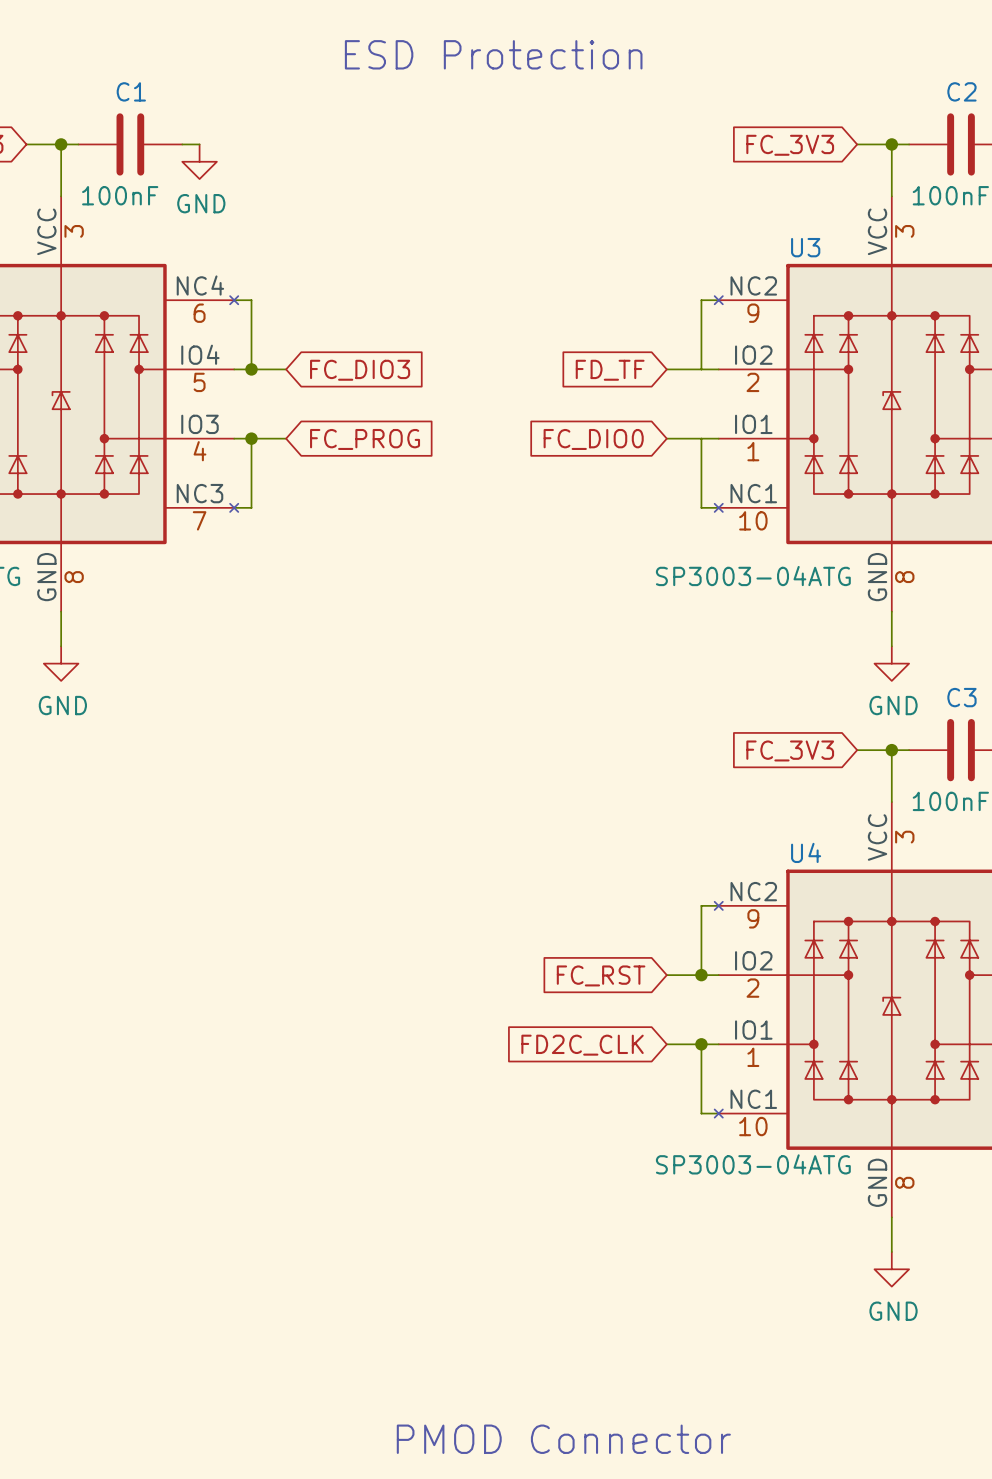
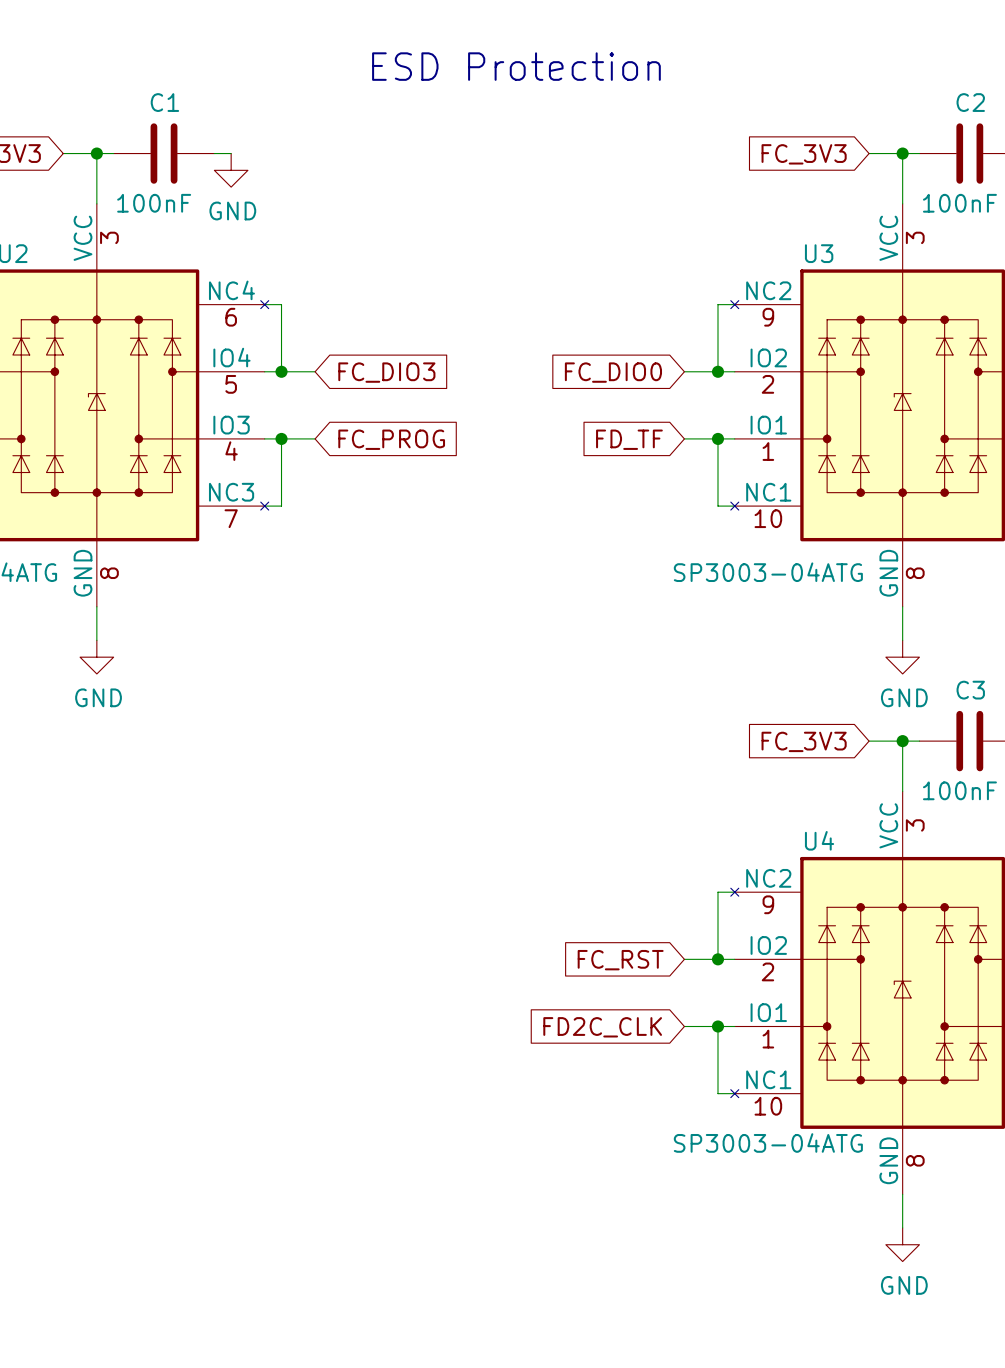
junction: none -> (717, 371)
global label: FD_TF (610, 370) -> FC_DIO0 (613, 372)
junction: none -> (717, 438)
global label: FC_DIO0 (593, 439) -> FD_TF (629, 439)

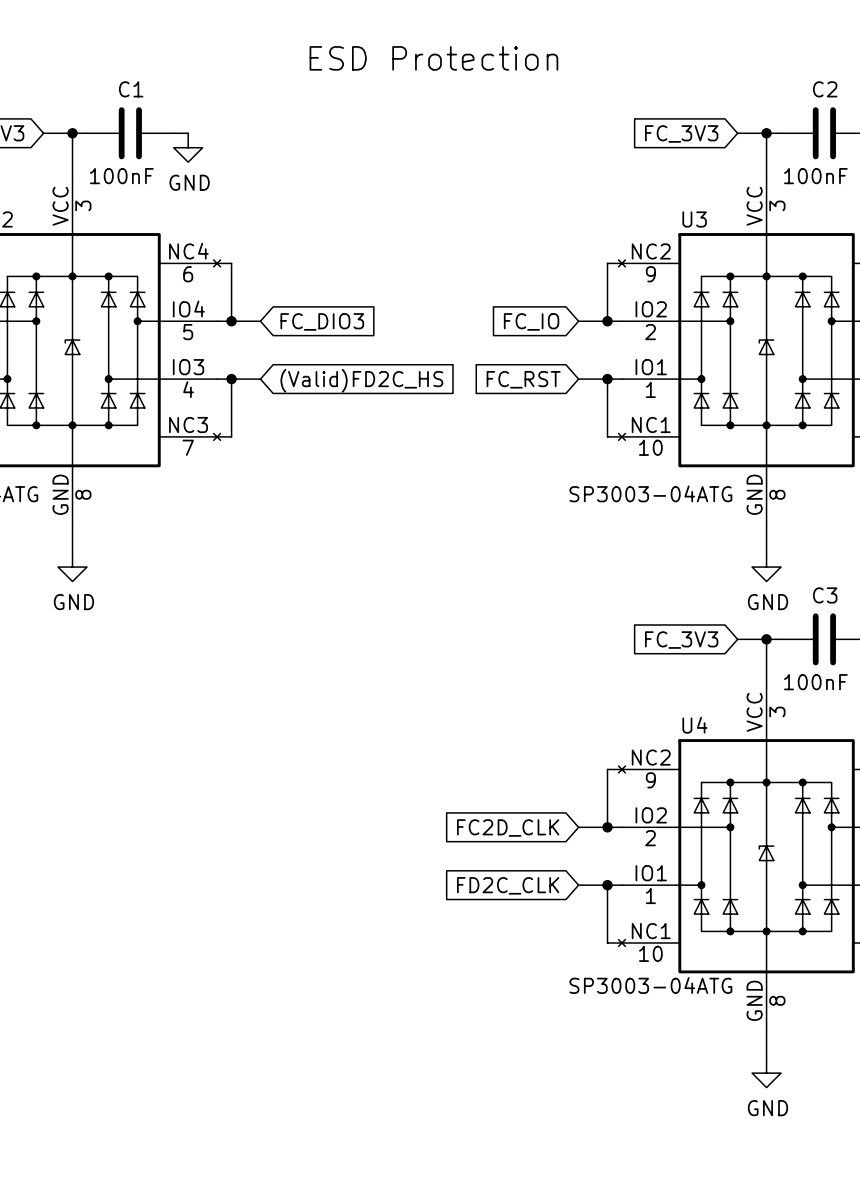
global label: FC_DIO0 (613, 372) -> FC_IO (531, 321)
global label: FC_PROG (391, 439) -> (Valid)FD2C_HS (361, 380)
global label: FD_TF (629, 439) -> FC_RST (523, 379)
global label: FC_RST (620, 960) -> FC2D_CLK (508, 828)

